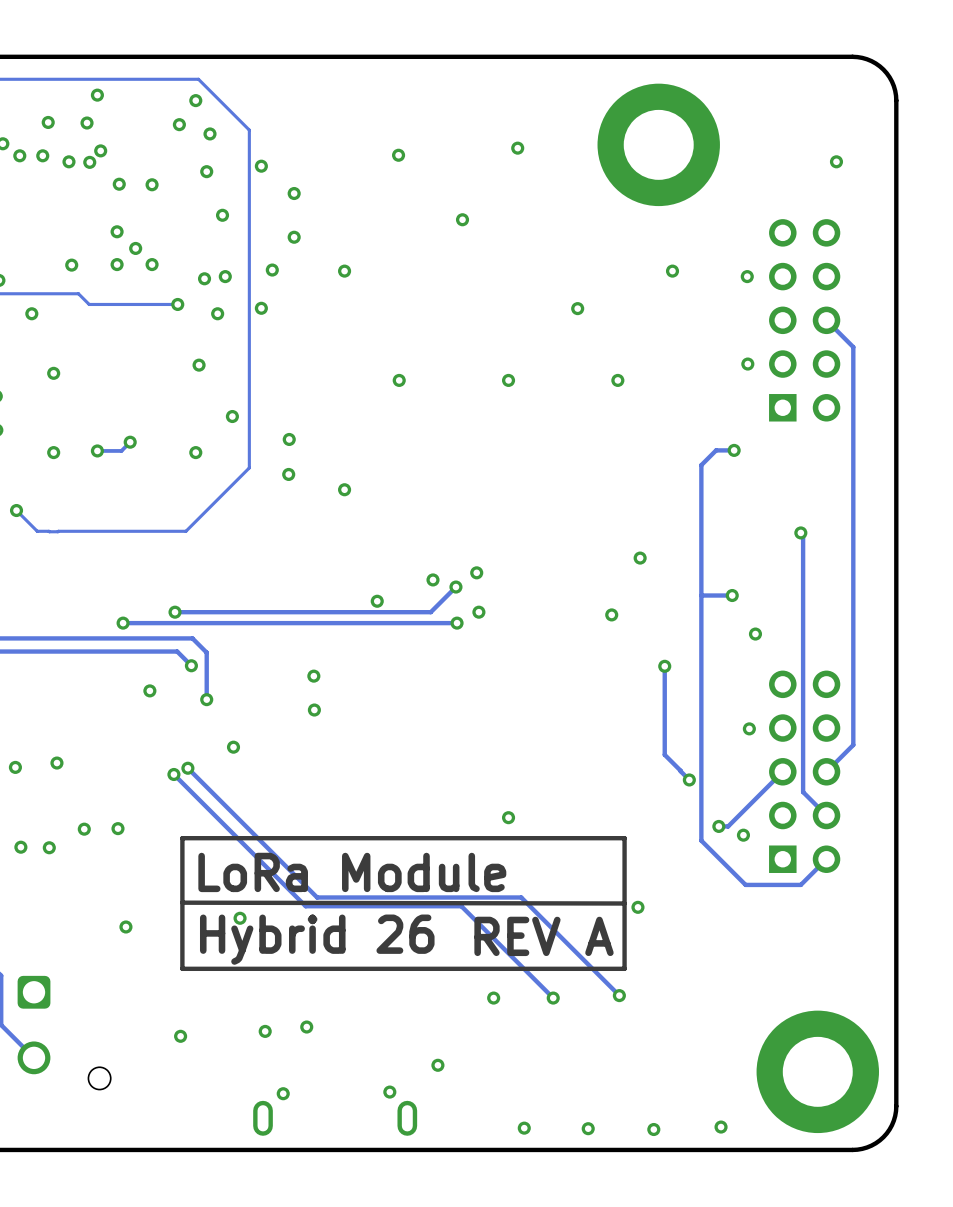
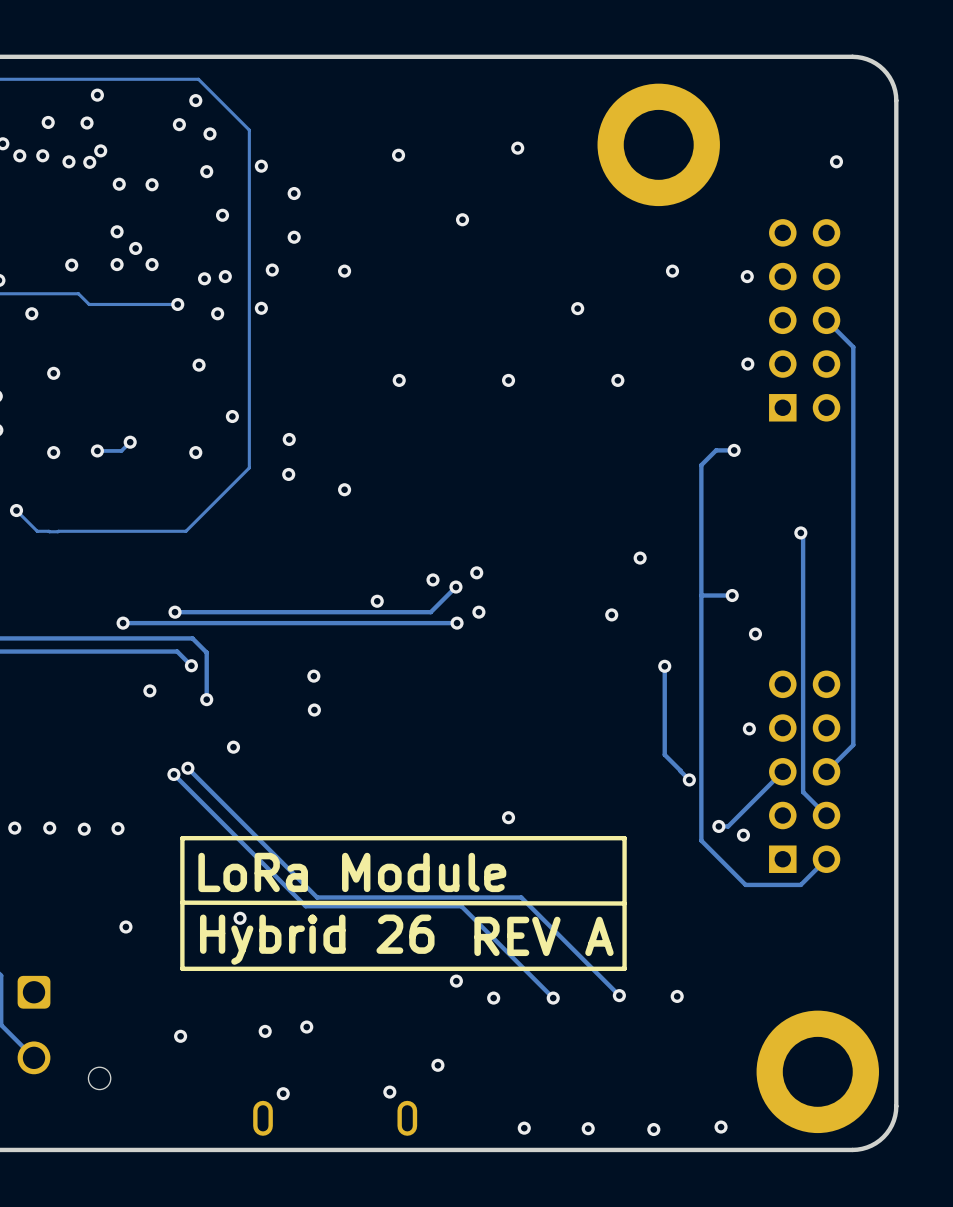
via: (56, 763) -> none
via: (15, 767) -> none
via: none -> (14, 828)
via: none -> (49, 828)
via: (20, 847) -> none
via: (49, 847) -> none
via position: (637, 907) -> (677, 996)
via: none -> (456, 981)

